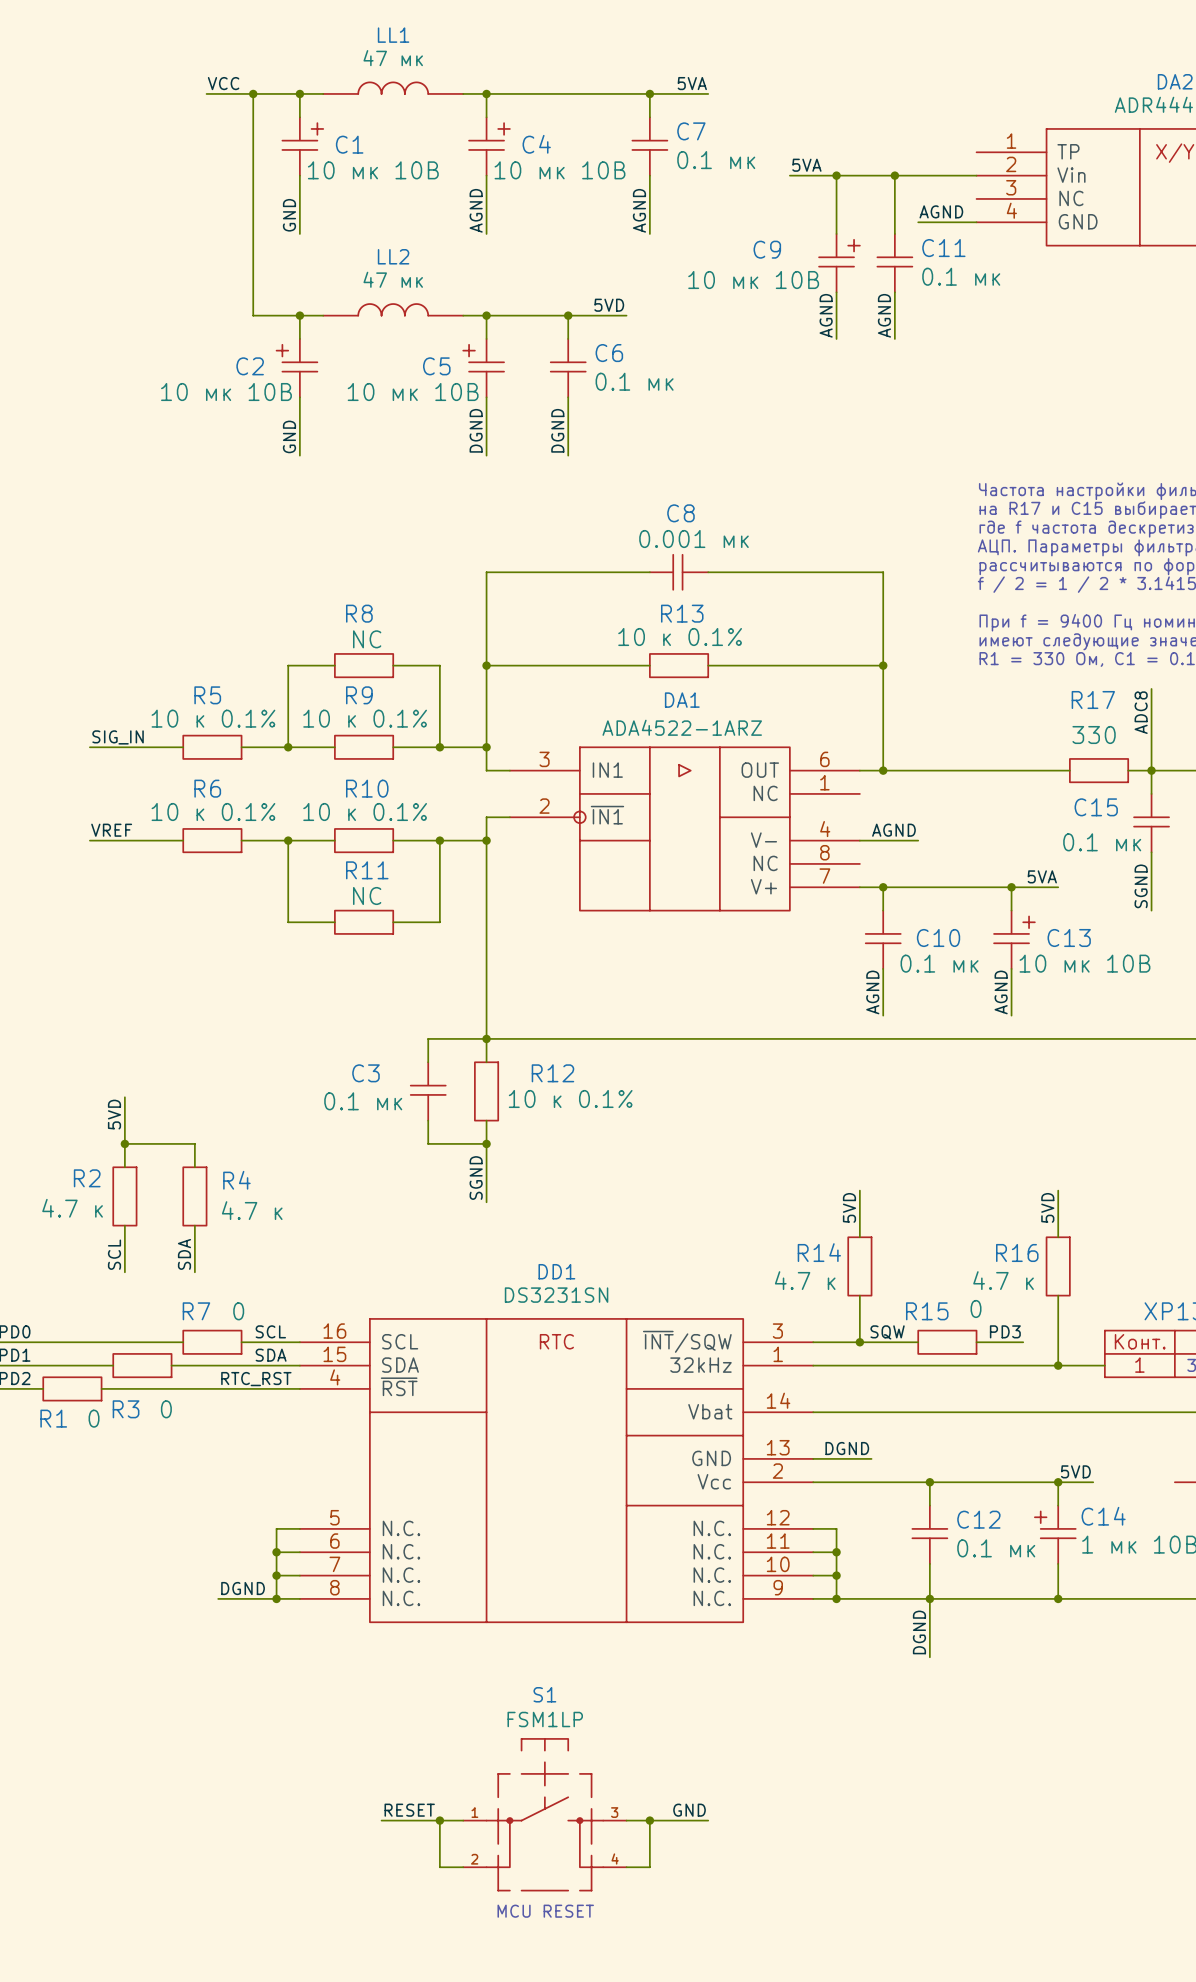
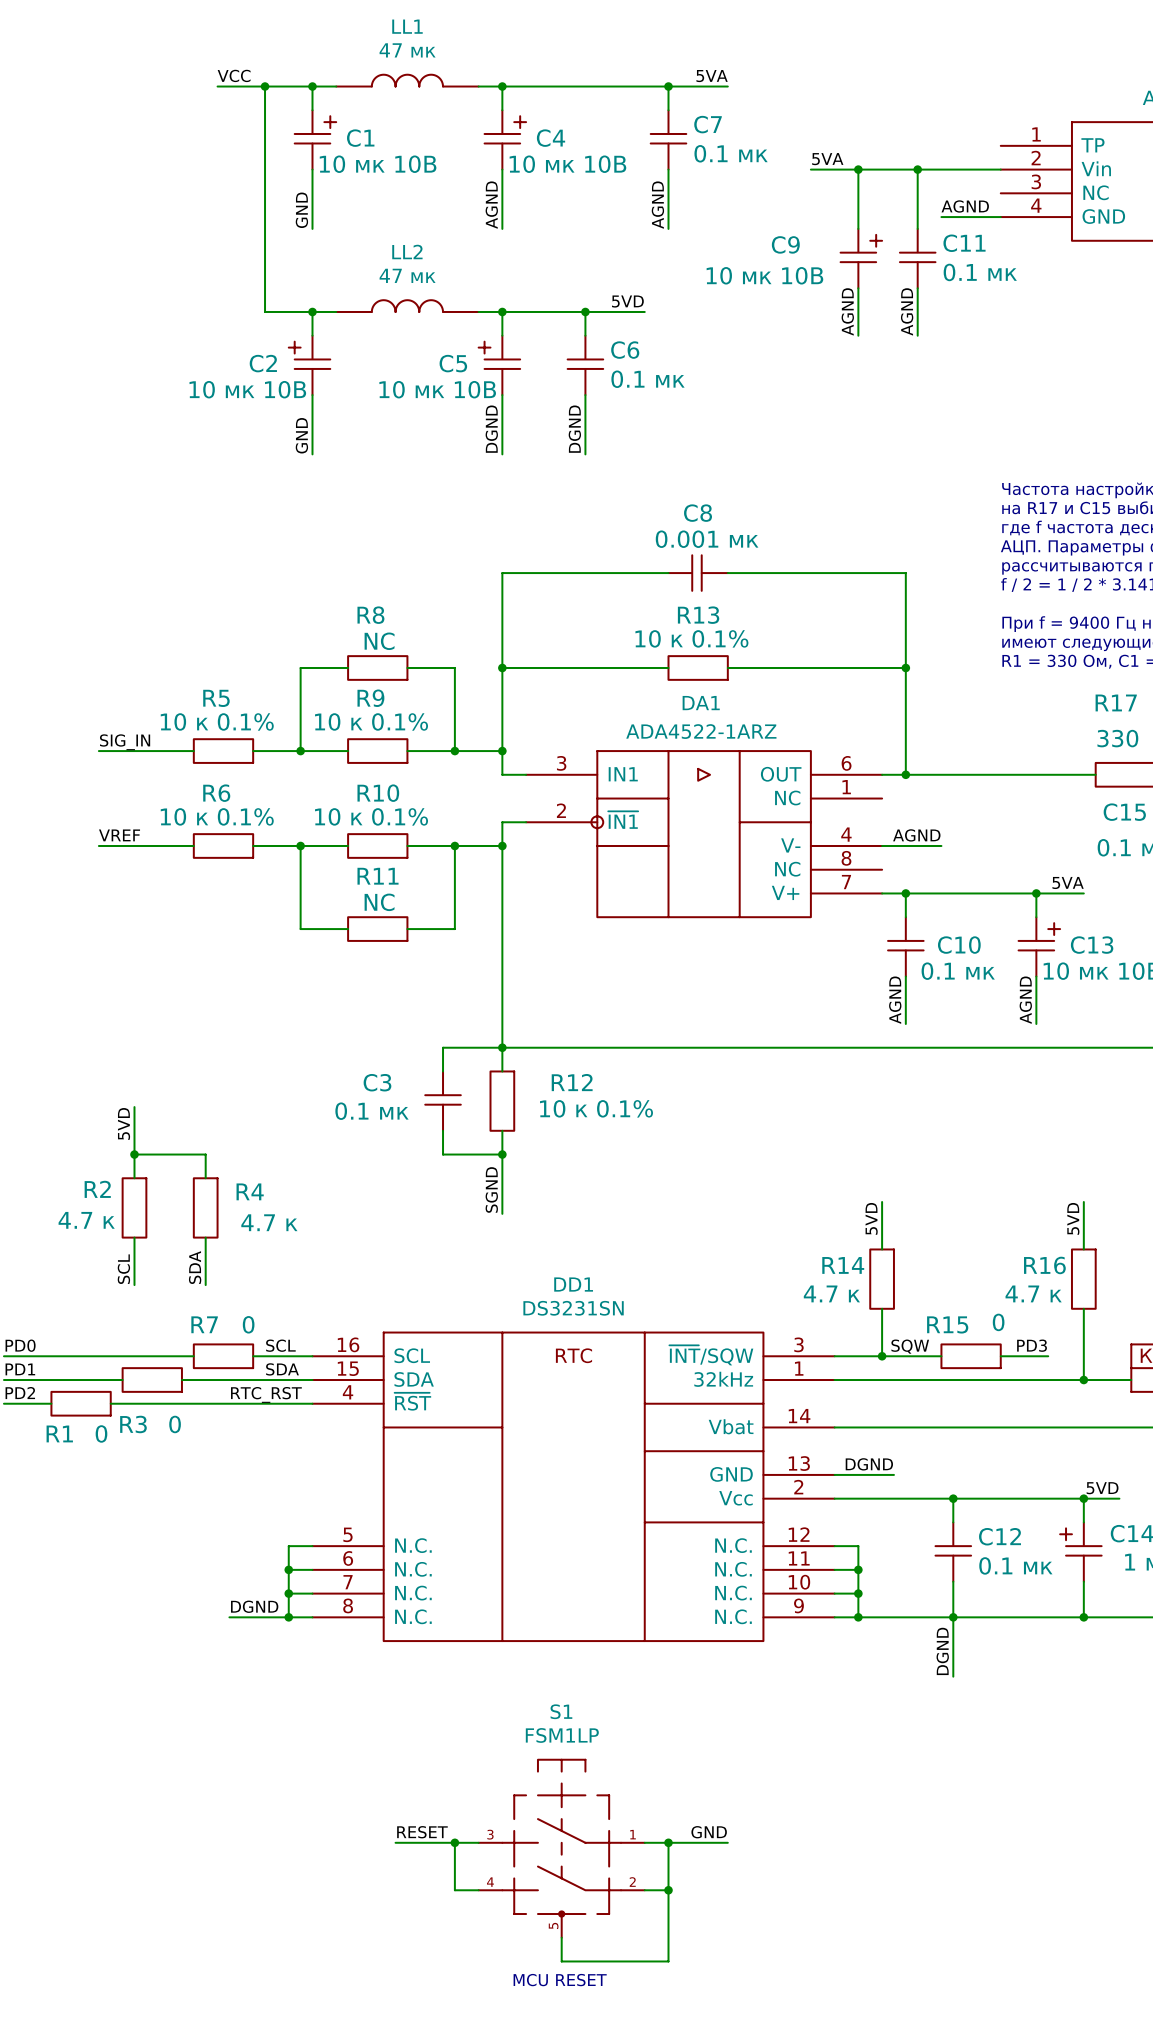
S1 symbol: [463, 1738, 627, 1891] -> [478, 1759, 645, 1938]
wire: none -> (668, 1890) (668, 1961) (561, 1961) (561, 1937)
junction: none -> (668, 1890)
text position: MCU RESET (545, 1911) -> MCU RESET (560, 1980)

